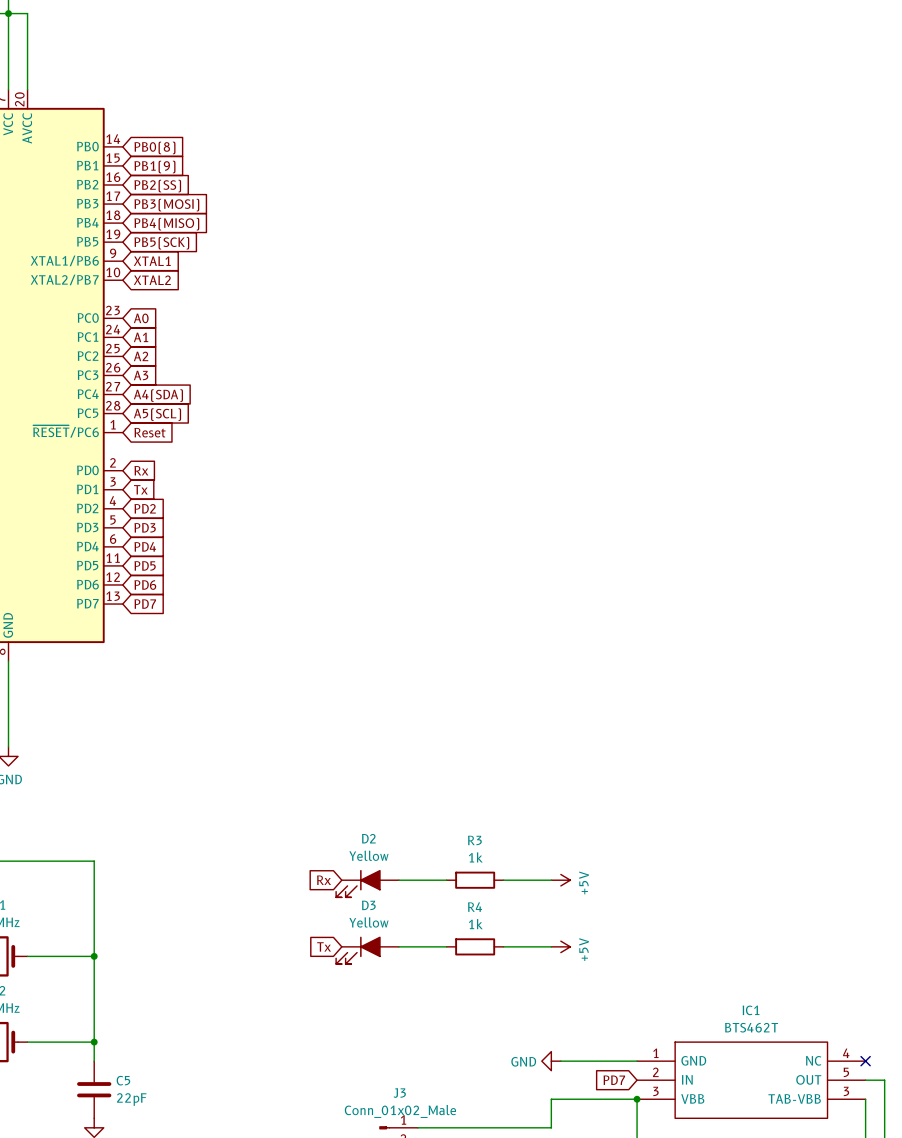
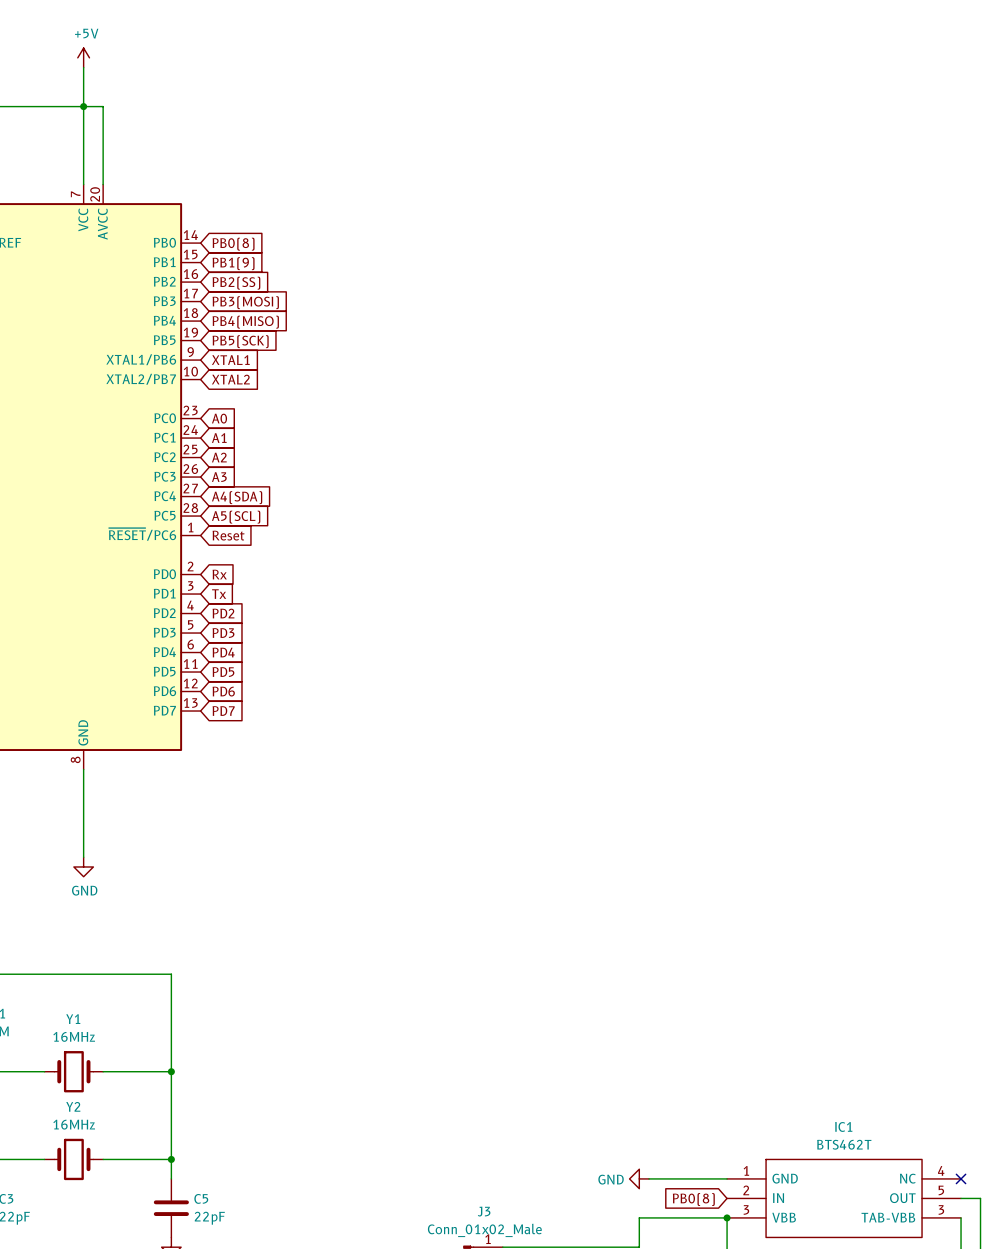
global label: Rx (324, 880) -> none
wire: (398, 880) (446, 880) -> none
R3: 1k (475, 880) -> none
wire: (503, 880) (551, 880) -> none
power symbol: +5V (560, 880) -> none
D2: Yellow (367, 883) -> none
global label: Tx (324, 946) -> none
wire: (398, 946) (446, 946) -> none
R4: 1k (475, 946) -> none
wire: (503, 946) (551, 946) -> none
power symbol: +5V (560, 946) -> none
D3: Yellow (367, 950) -> none
global label: PD7 (614, 1080) -> PB0(8) (693, 1199)

